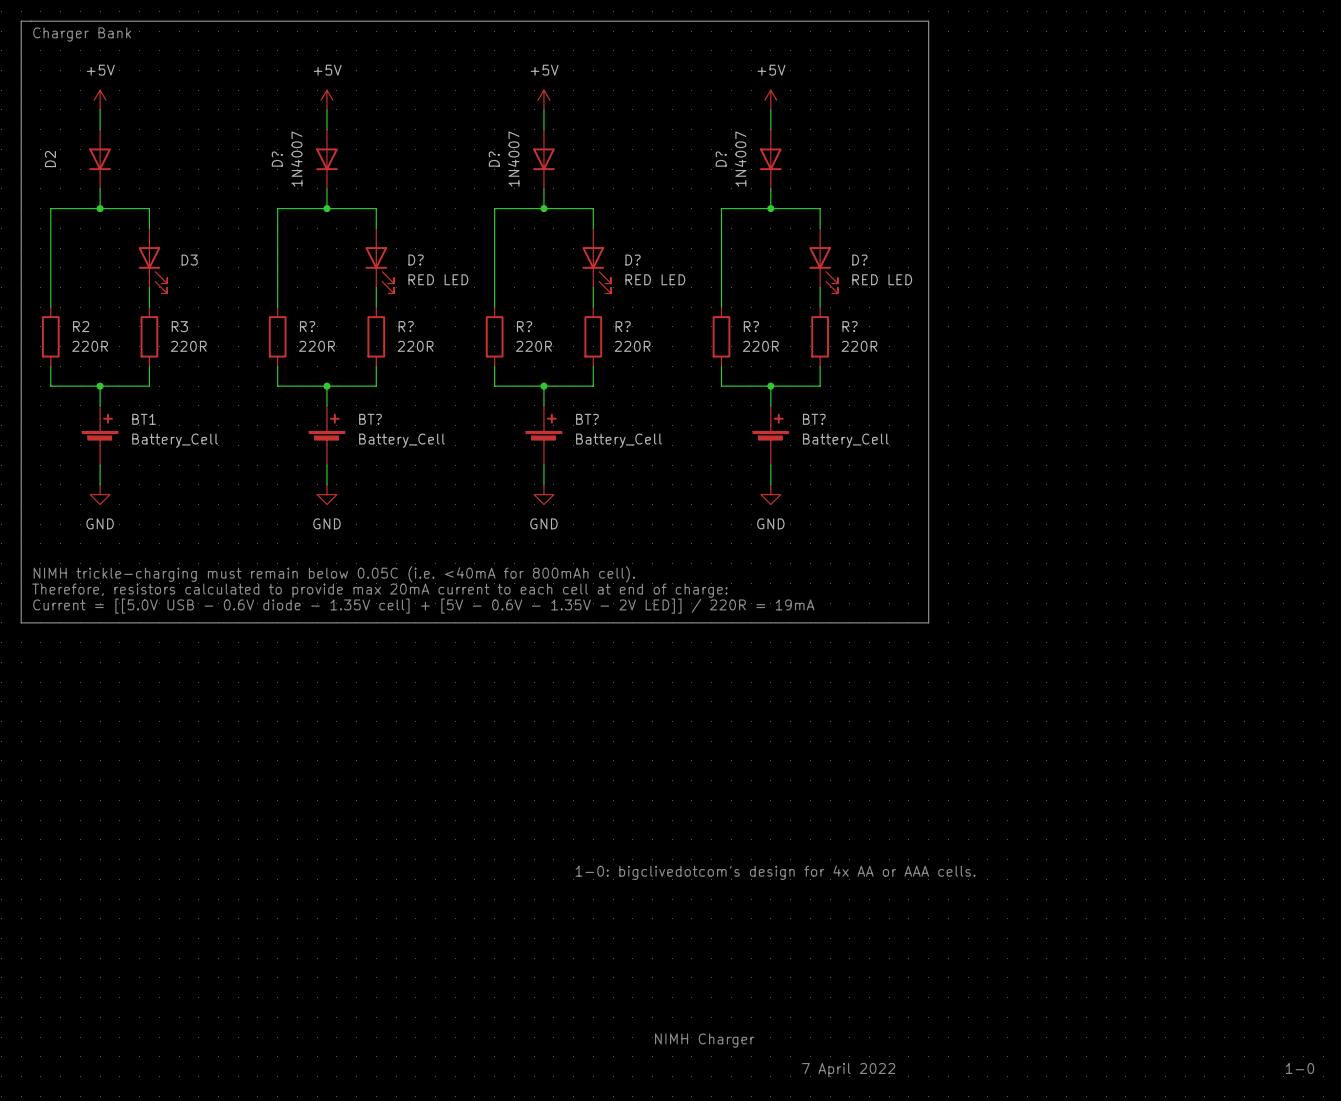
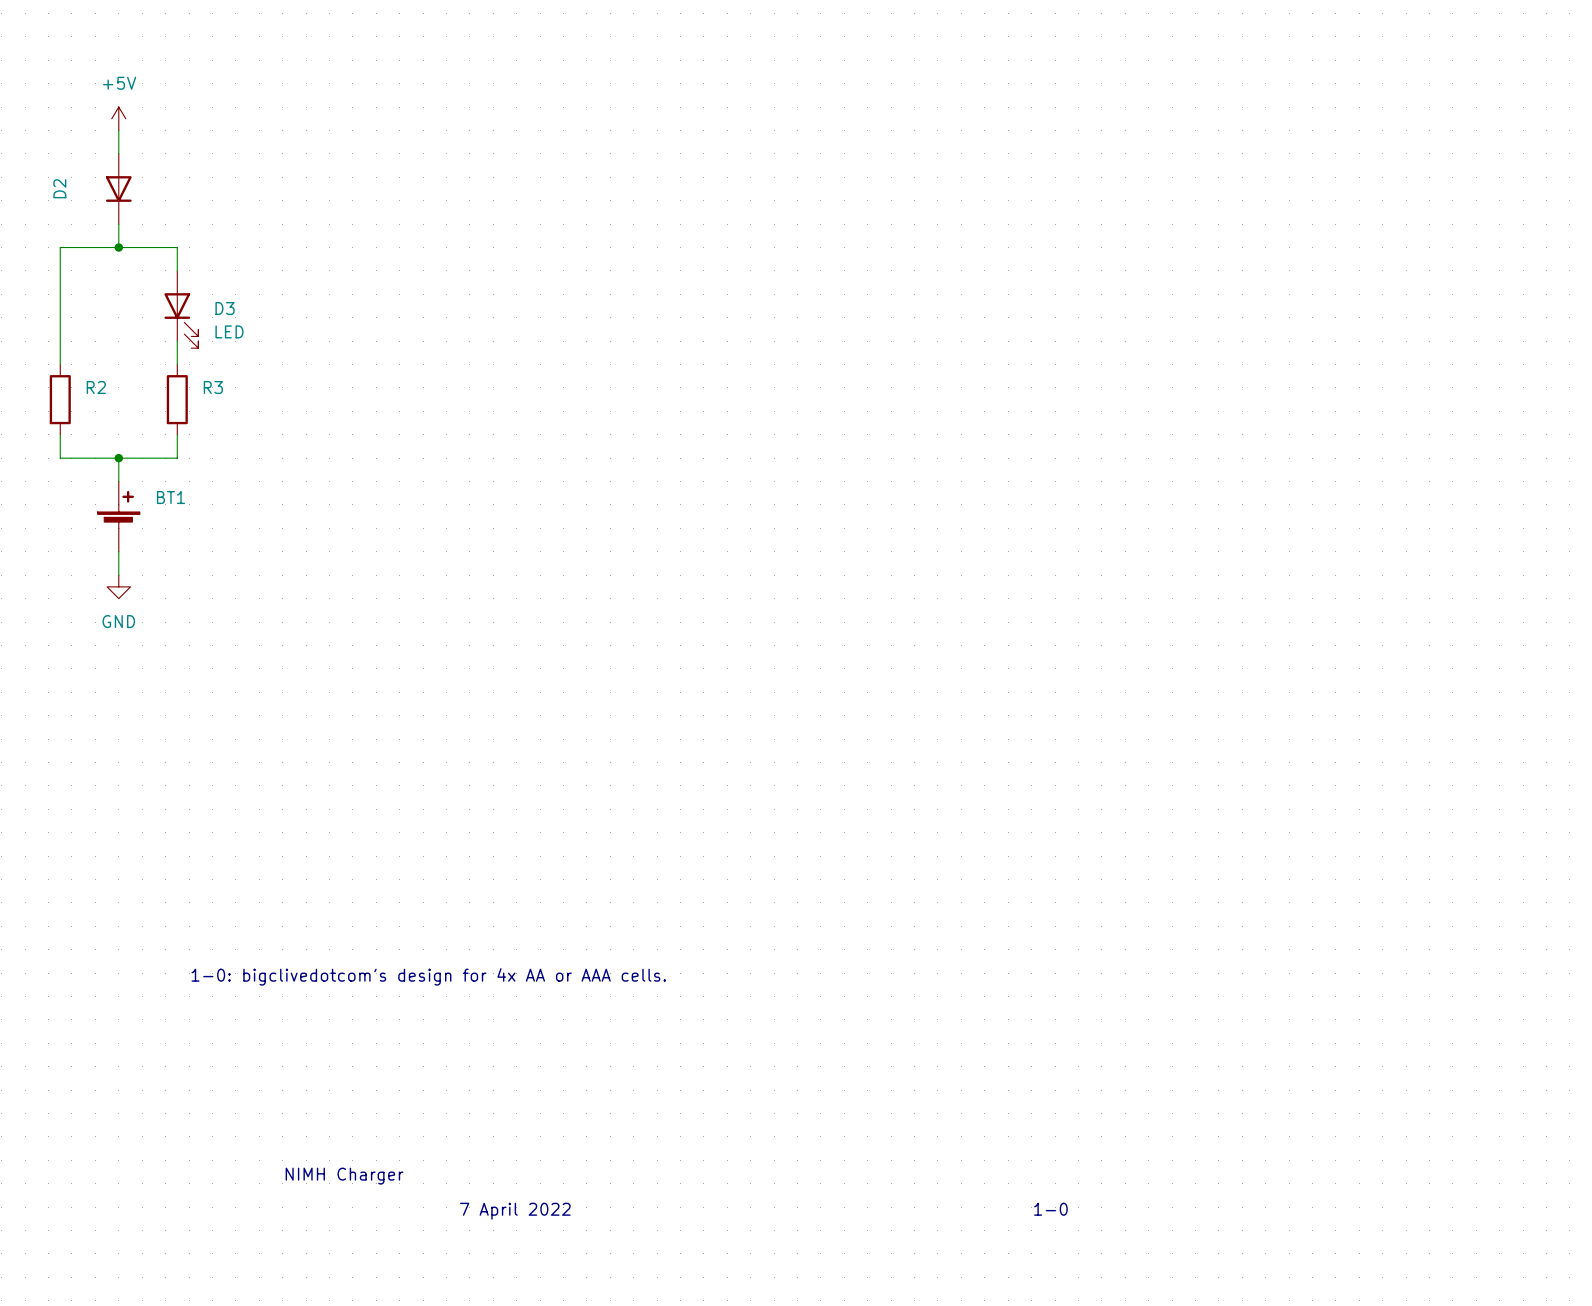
line: (21, 21) (21, 622) (928, 622) (928, 21) (21, 21) -> none
text: Charger Bank (82, 34) -> none
power symbol: +5V (326, 100) -> none
power symbol: +5V (543, 100) -> none
power symbol: +5V (770, 100) -> none
wire: (326, 109) (326, 129) -> none
wire: (543, 109) (543, 129) -> none
wire: (770, 109) (770, 129) -> none
D?: 1N4007 (326, 159) -> none
D?: 1N4007 (543, 159) -> none
D?: 1N4007 (770, 159) -> none
wire: (326, 188) (326, 208) -> none
wire: (543, 188) (543, 208) -> none
wire: (770, 188) (770, 208) -> none
junction: (326, 208) -> none
junction: (543, 208) -> none
junction: (770, 208) -> none
wire: (376, 228) (376, 208) (277, 208) (277, 307) -> none
wire: (593, 228) (593, 208) (494, 208) (494, 307) -> none
wire: (820, 228) (820, 208) (721, 208) (721, 307) -> none
D?: RED LED (379, 260) -> none
D?: RED LED (596, 260) -> none
D?: RED LED (823, 260) -> none
D3 value: none -> LED (229, 331)
wire: (376, 287) (376, 307) -> none
wire: (593, 287) (593, 307) -> none
wire: (820, 287) (820, 307) -> none
R?: 220R (277, 336) -> none
R?: 220R (376, 336) -> none
R?: 220R (494, 336) -> none
R?: 220R (593, 336) -> none
R?: 220R (721, 336) -> none
R?: 220R (820, 336) -> none
R2 value: 220R (90, 346) -> none
R3 value: 220R (188, 346) -> none
wire: (277, 366) (277, 386) (376, 386) (376, 366) -> none
wire: (494, 366) (494, 386) (593, 386) (593, 366) -> none
wire: (721, 366) (721, 386) (820, 386) (820, 366) -> none
wire: (326, 386) (326, 405) -> none
junction: (326, 386) -> none
wire: (543, 386) (543, 405) -> none
junction: (543, 386) -> none
wire: (770, 386) (770, 405) -> none
junction: (770, 386) -> none
BT?: Battery_Cell (326, 435) -> none
BT?: Battery_Cell (543, 435) -> none
BT?: Battery_Cell (770, 435) -> none
BT1 value: Battery_Cell (175, 440) -> none
wire: (326, 465) (326, 484) -> none
wire: (543, 465) (543, 484) -> none
wire: (770, 465) (770, 484) -> none
power symbol: GND (326, 494) -> none
power symbol: GND (543, 494) -> none
power symbol: GND (770, 494) -> none
text: NIMH trickle-charging must remain below 0.05C (i.e. <40mA for 800mAh cell). (334, 574) -> none
text: Therefore, resistors calculated to provide max 20mA current to each cell at end of charge: (379, 590) -> none
text: Current = [[5.0V USB - 0.6V diode - 1.35V cell] + [5V - 0.6V - 1.35V - 2V LED]] / 220R = 19mA (423, 606) -> none
text: none -> 1-0: bigclivedotcom's design for 4x AA or AAA cells. (428, 976)
text: 1-0: bigclivedotcom's design for 4x AA or AAA cells. (775, 872) -> none
text: none -> NIMH Charger (344, 1176)
text: none -> 1-0 (1050, 1209)
text: none -> 7 April 2022 (515, 1211)
text: NIMH Charger (704, 1040) -> none
text: 1-0 (1299, 1068) -> none
text: 7 April 2022 (848, 1070) -> none

